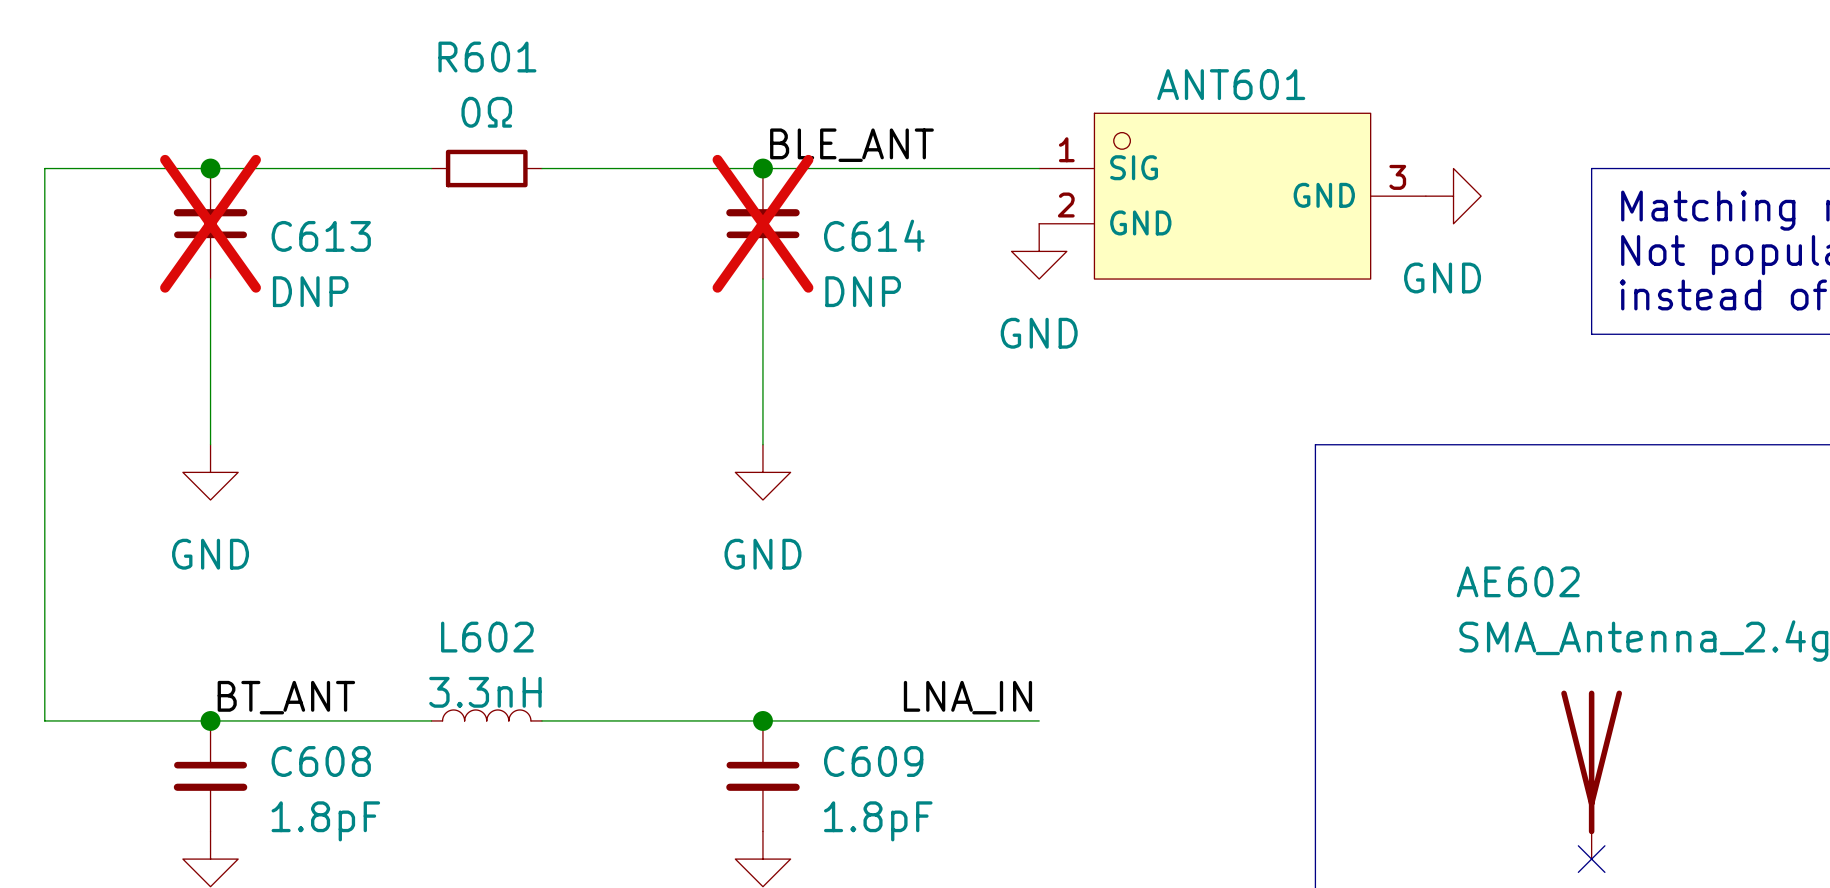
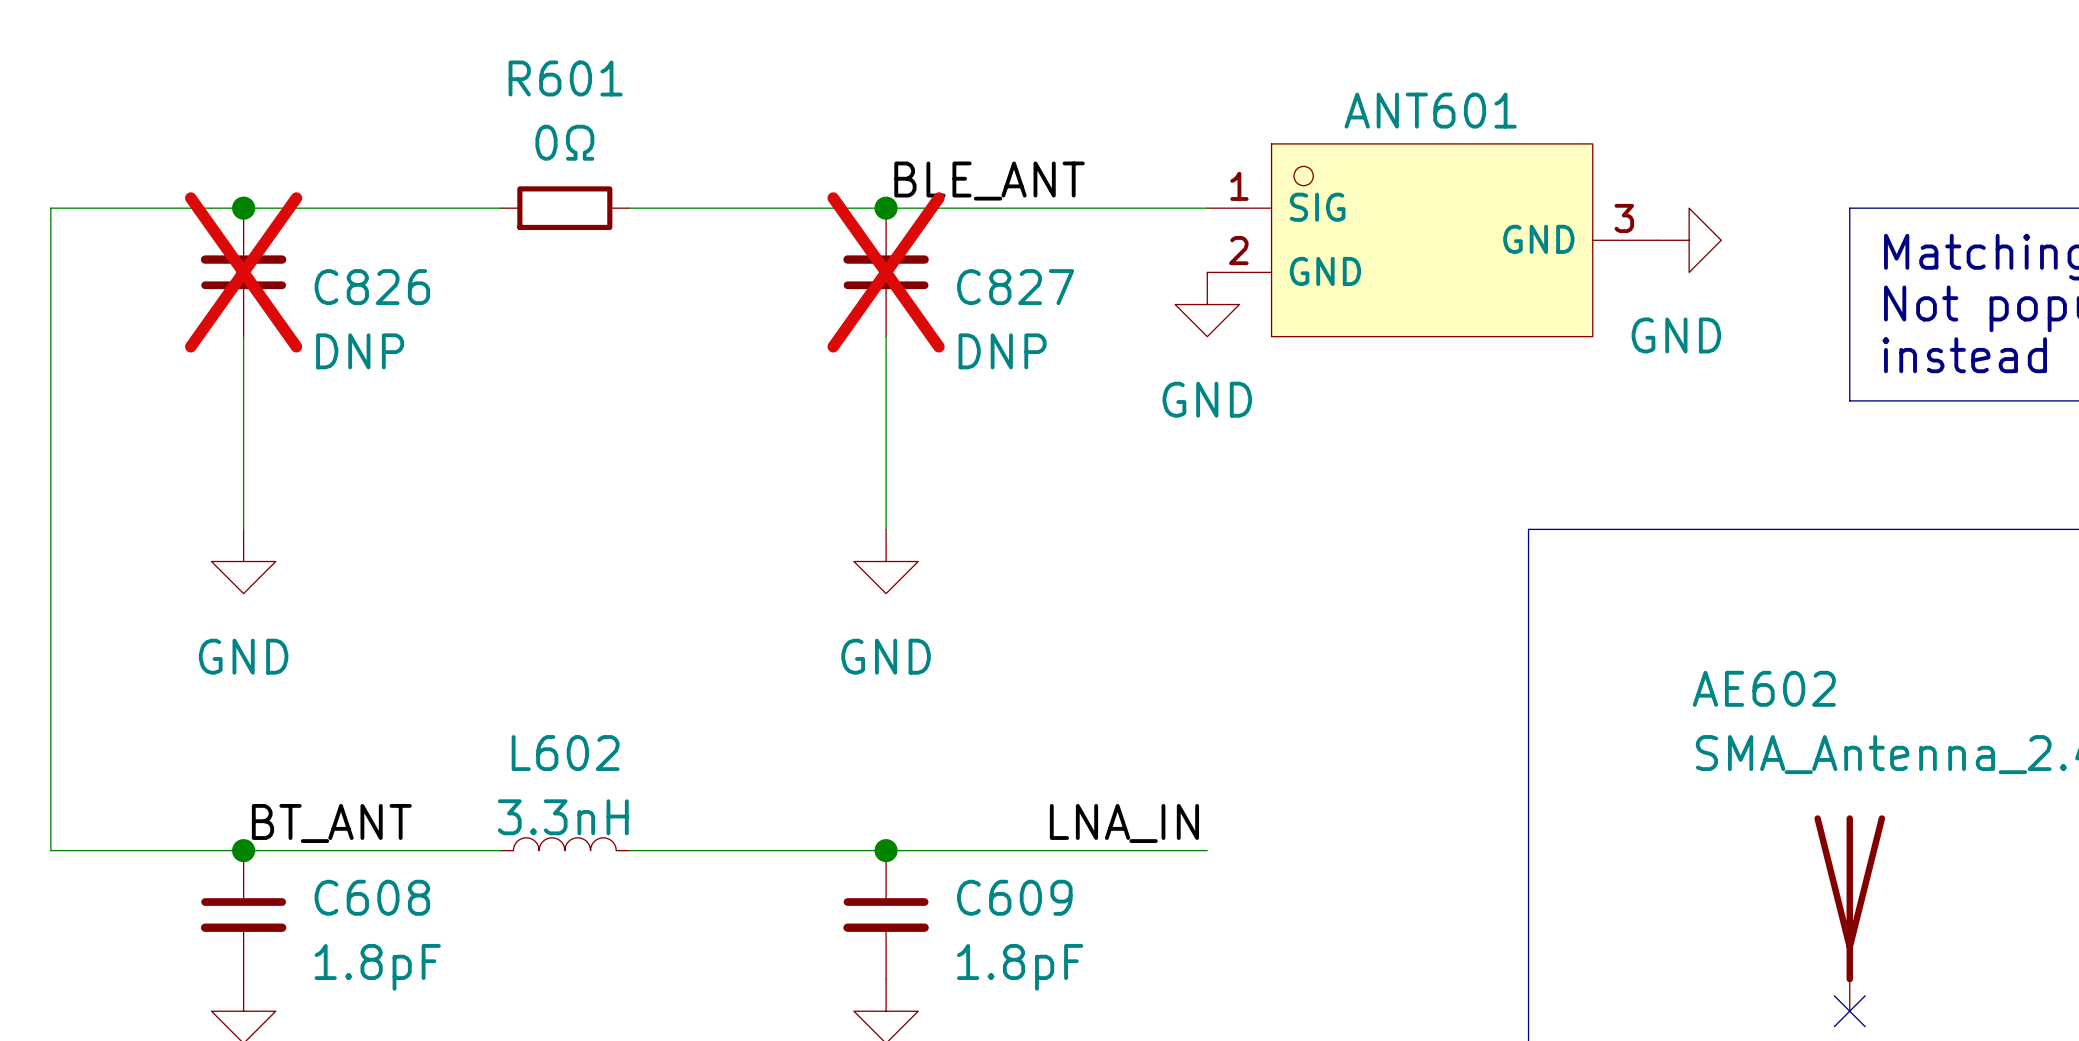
C614 name: C614 (874, 235) -> C827 (1015, 287)
C613 name: C613 (321, 236) -> C826 (372, 287)

